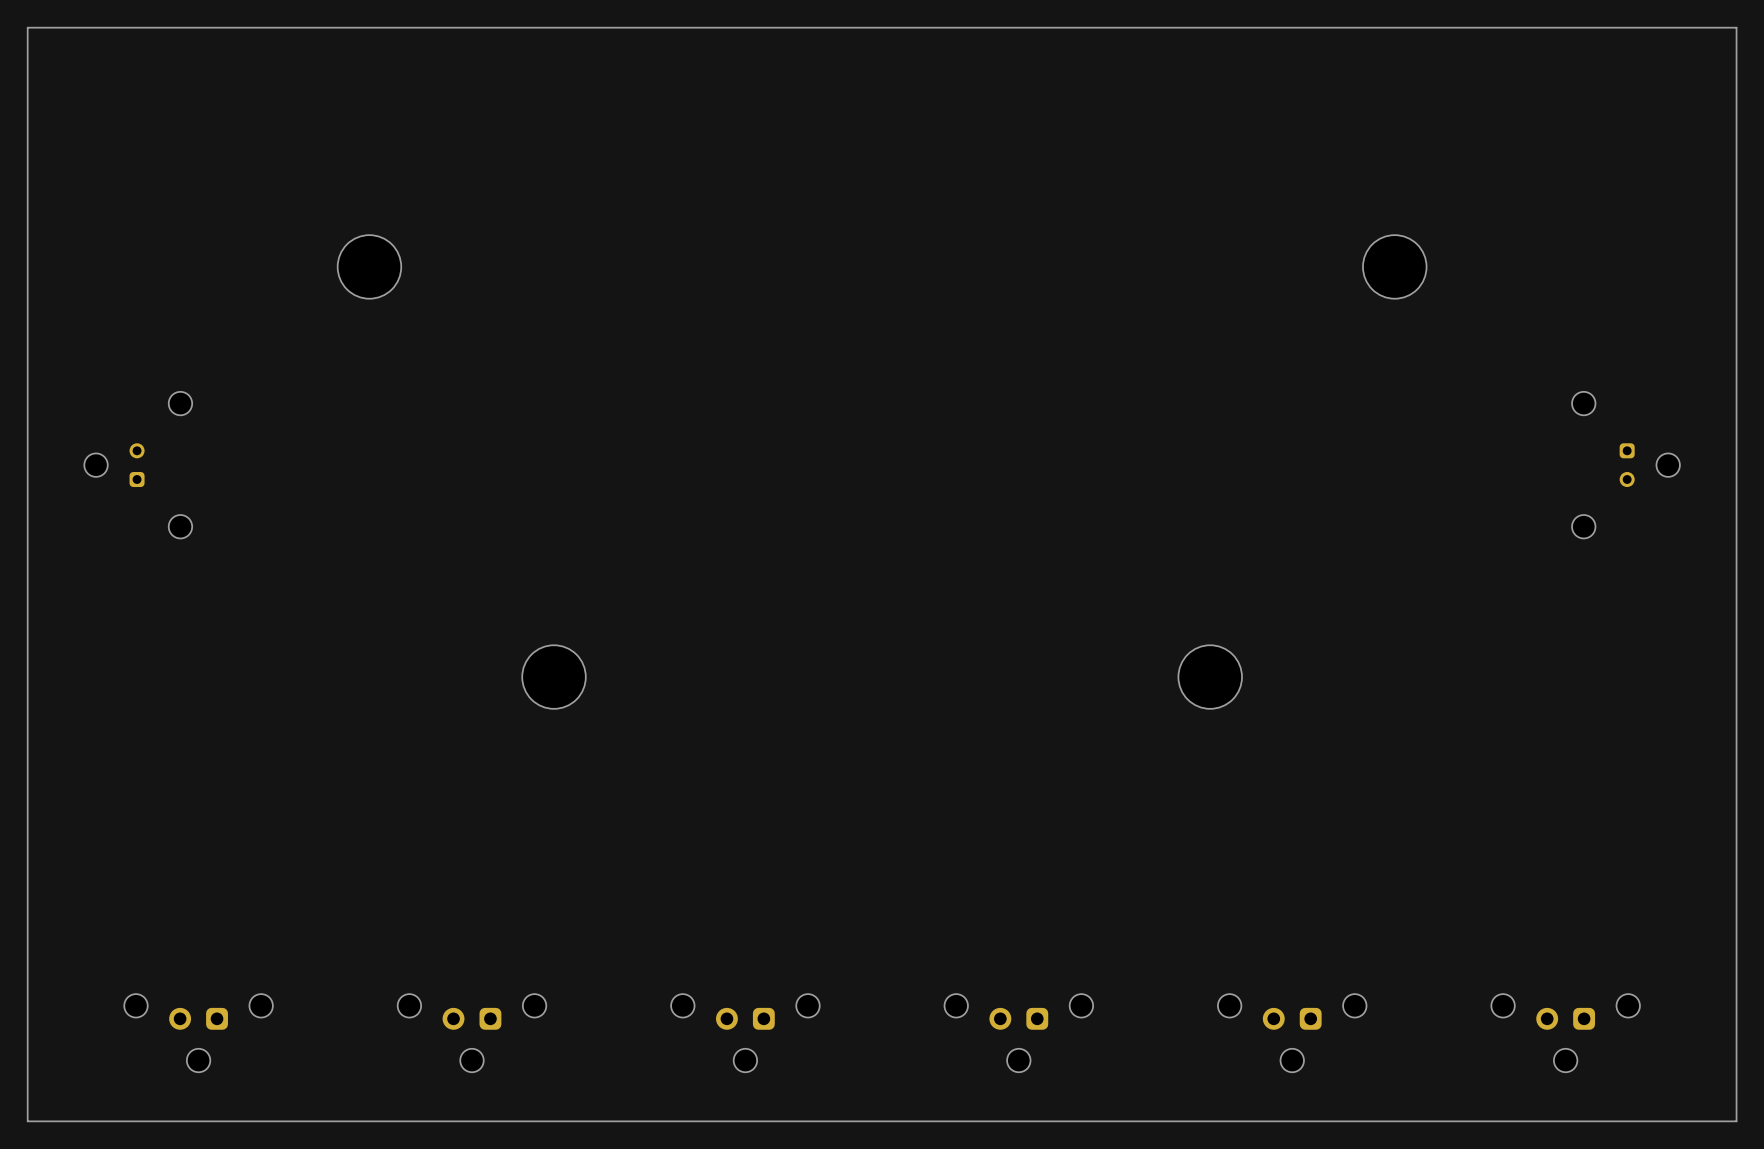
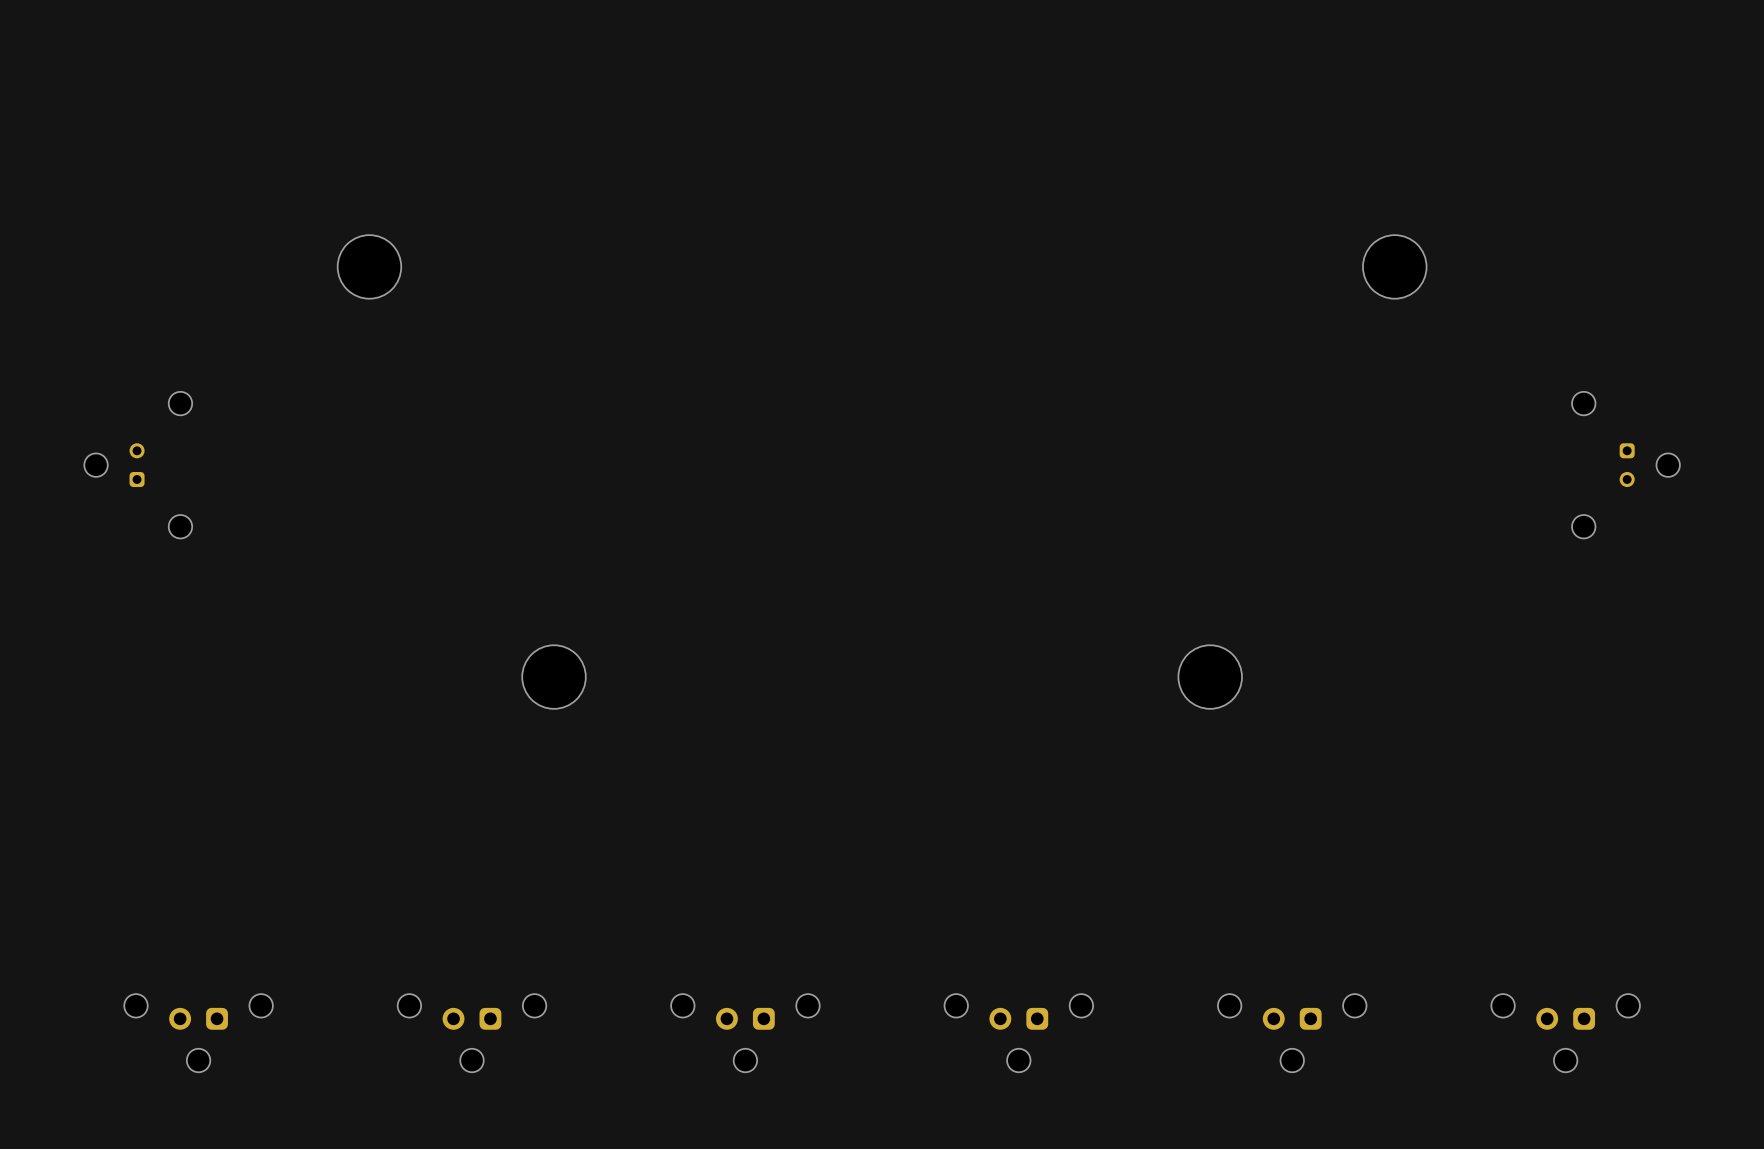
board edge: (1736, 27) (27, 27) (27, 1121) (1736, 1121) (1736, 27) -> none

